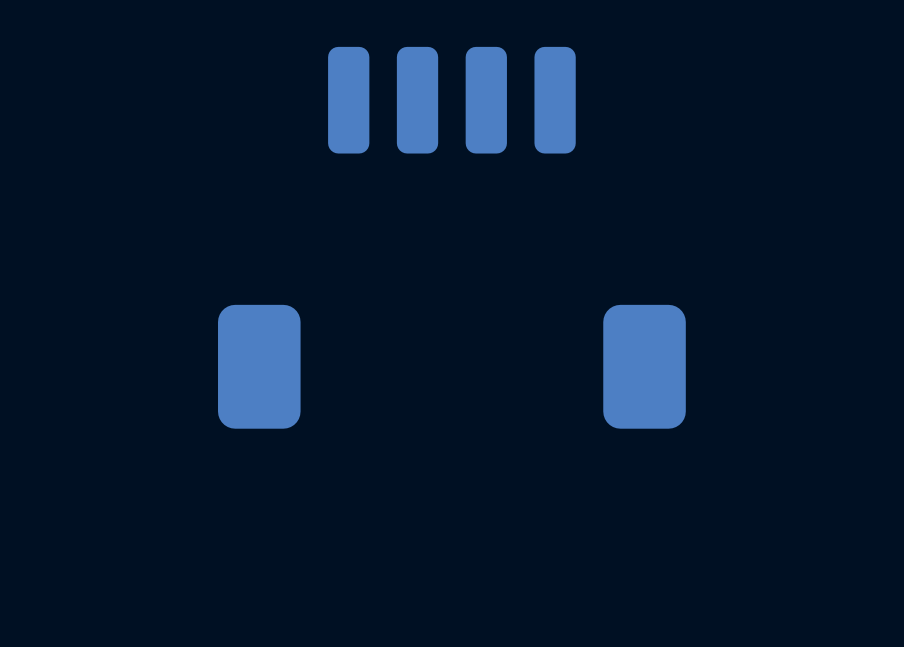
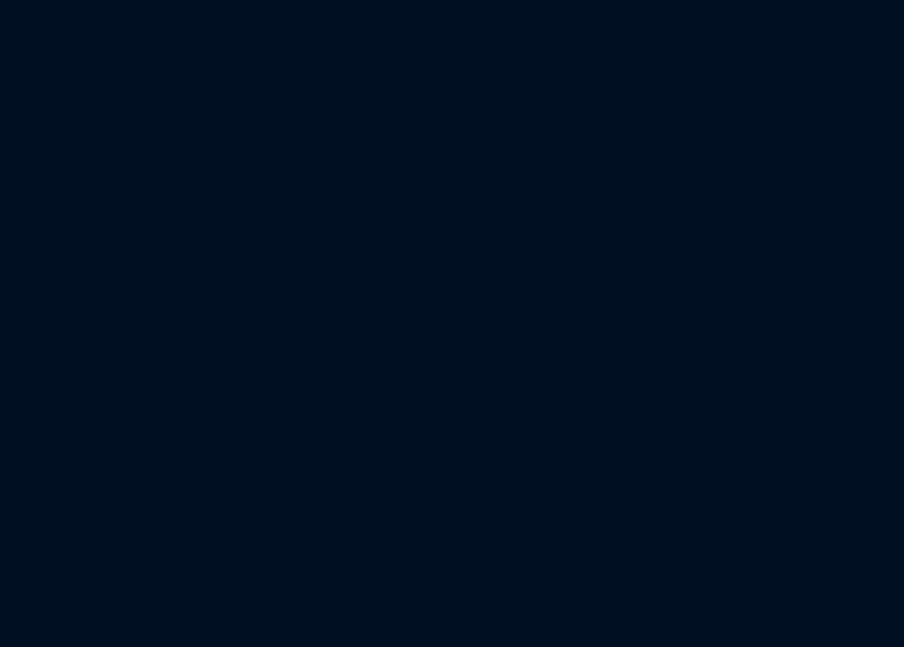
part: (451, 237) -> none

